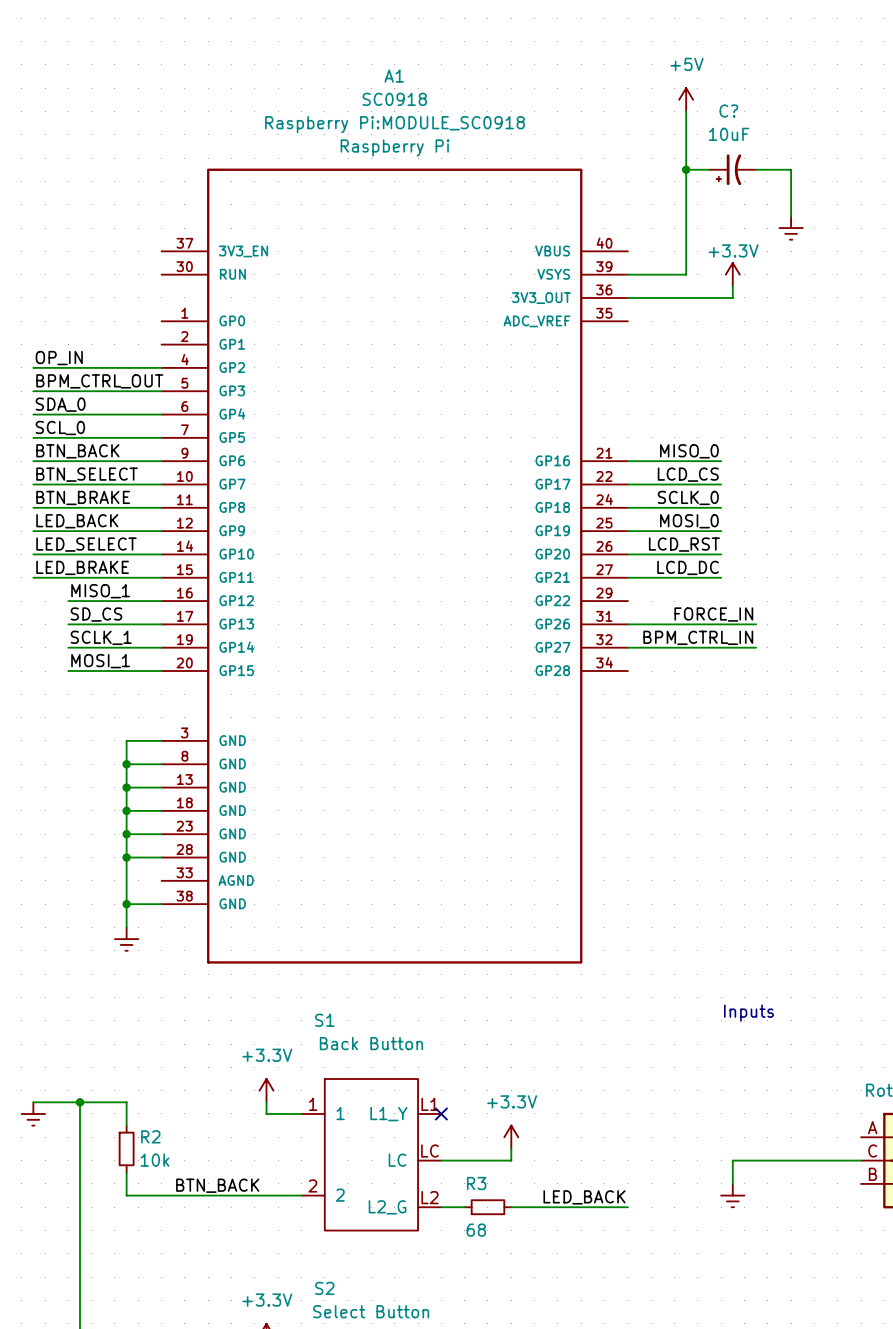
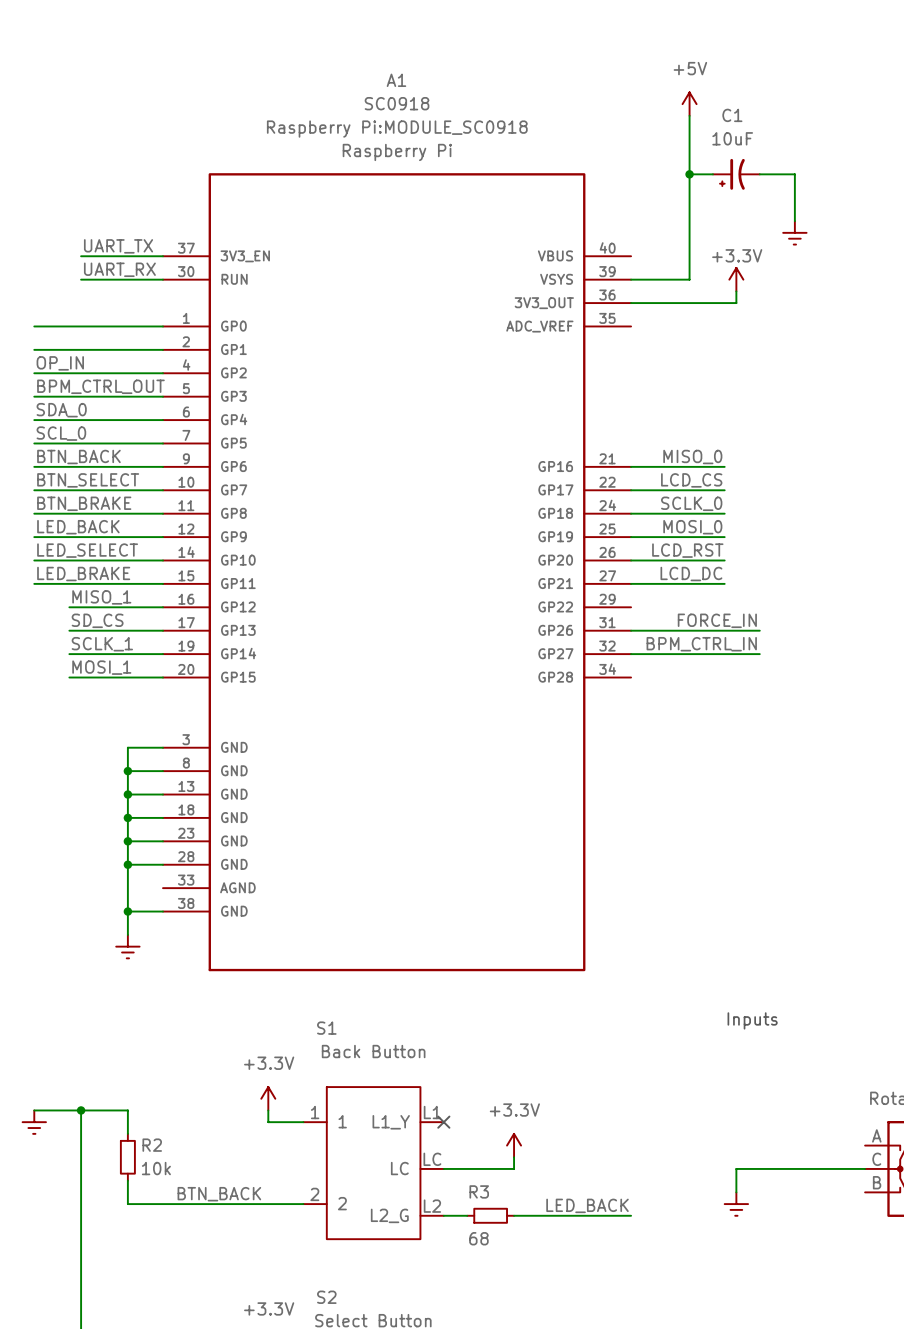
C? name: C? (728, 111) -> C1 (732, 115)
label: none -> UART_TX (118, 246)
wire: none -> (81, 256) (163, 256)
label: none -> UART_RX (119, 269)
wire: none -> (81, 279) (163, 279)
wire: none -> (34, 326) (163, 326)
wire: none -> (34, 349) (163, 349)

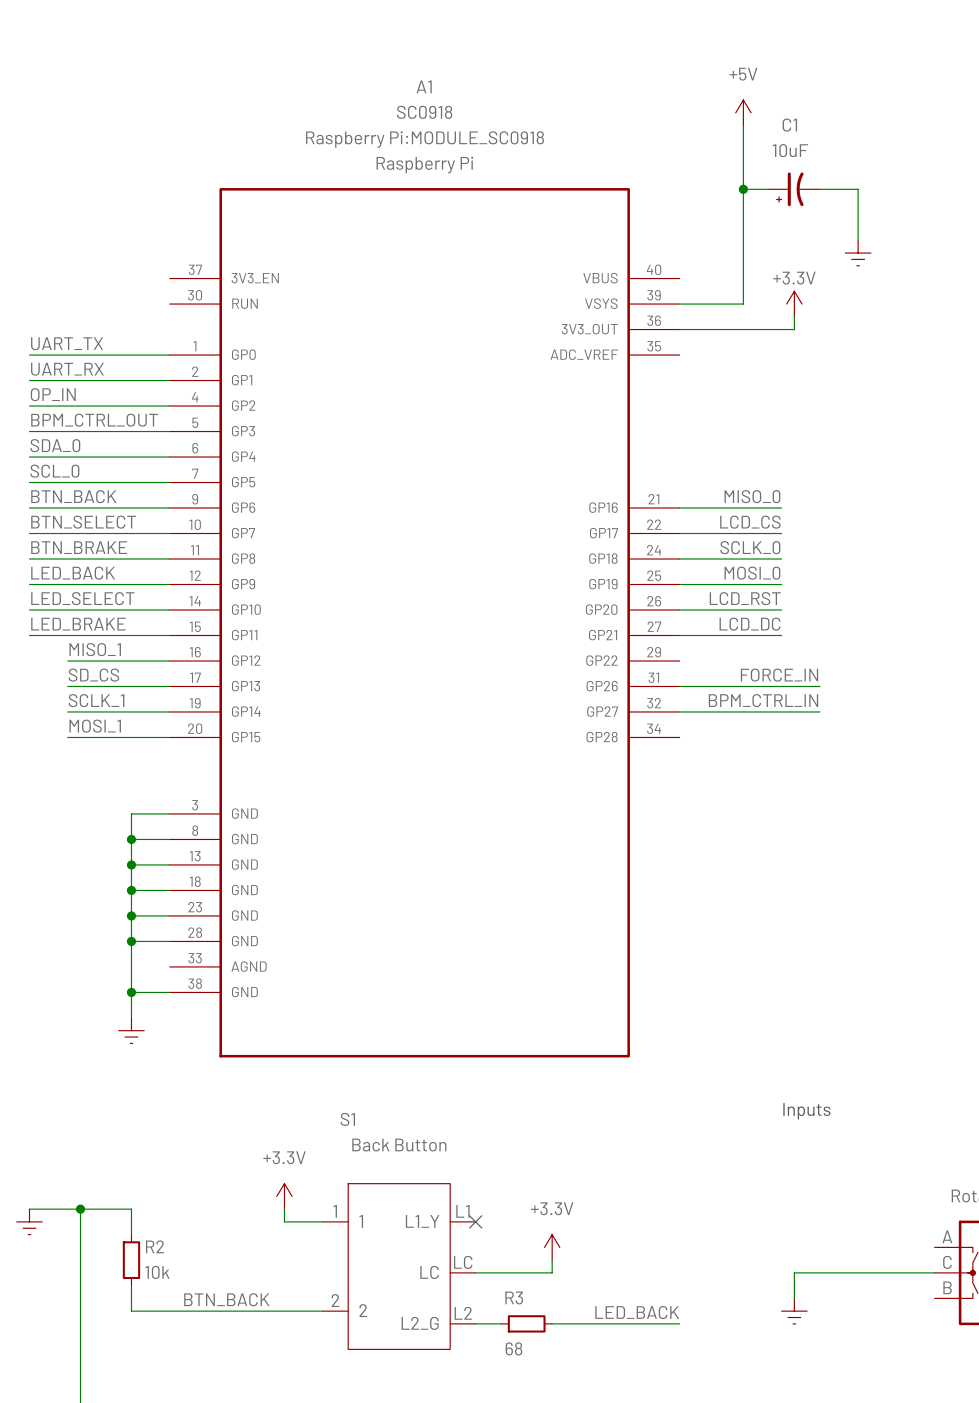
label position: UART_TX (118, 246) -> UART_TX (67, 343)
wire: (81, 256) (163, 256) -> none
label position: UART_RX (119, 269) -> UART_RX (67, 369)
wire: (81, 279) (163, 279) -> none

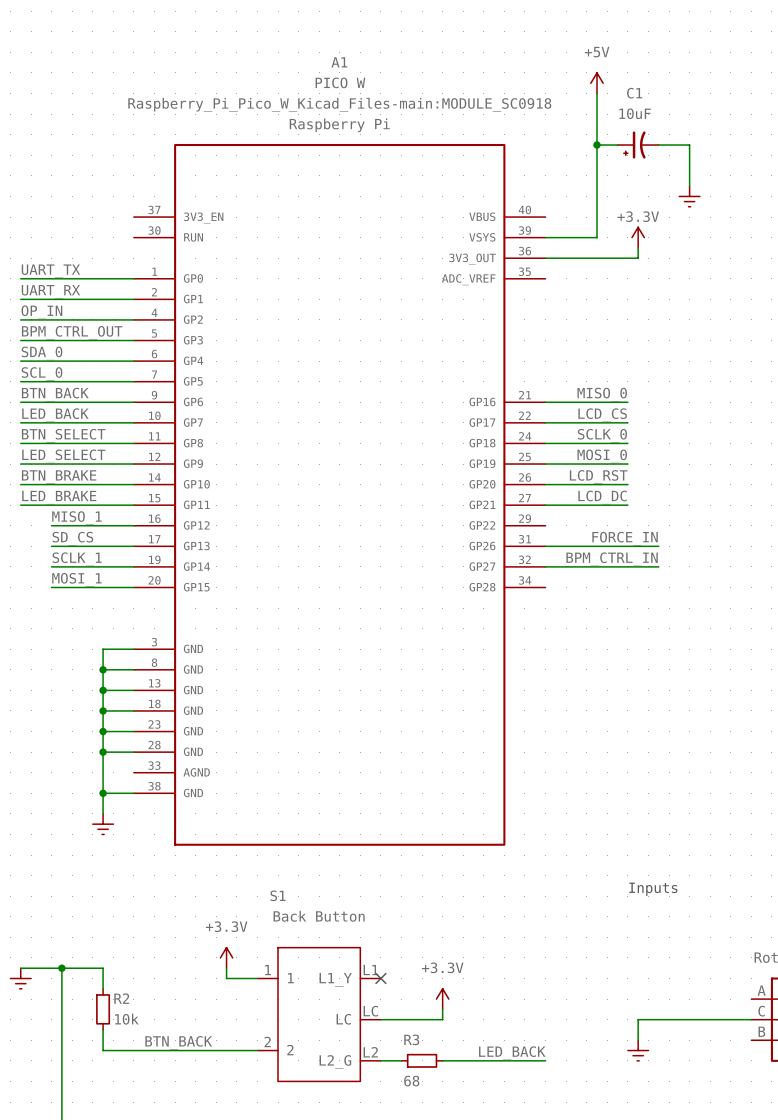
A1 value: SC0918 (424, 112) -> PICO W (340, 82)
A1 text: Raspberry Pi:MODULE_SC0918 (424, 139) -> Raspberry_Pi_Pico_W_Kicad_Files-main:MODULE_SC0918 (339, 104)
label: BTN_SELECT (83, 522) -> LED_BACK (55, 415)
label: BTN_BRAKE (79, 547) -> BTN_SELECT (63, 435)
label: LED_BACK (73, 573) -> LED_SELECT (63, 456)
label: LED_SELECT (82, 598) -> BTN_BRAKE (59, 477)

